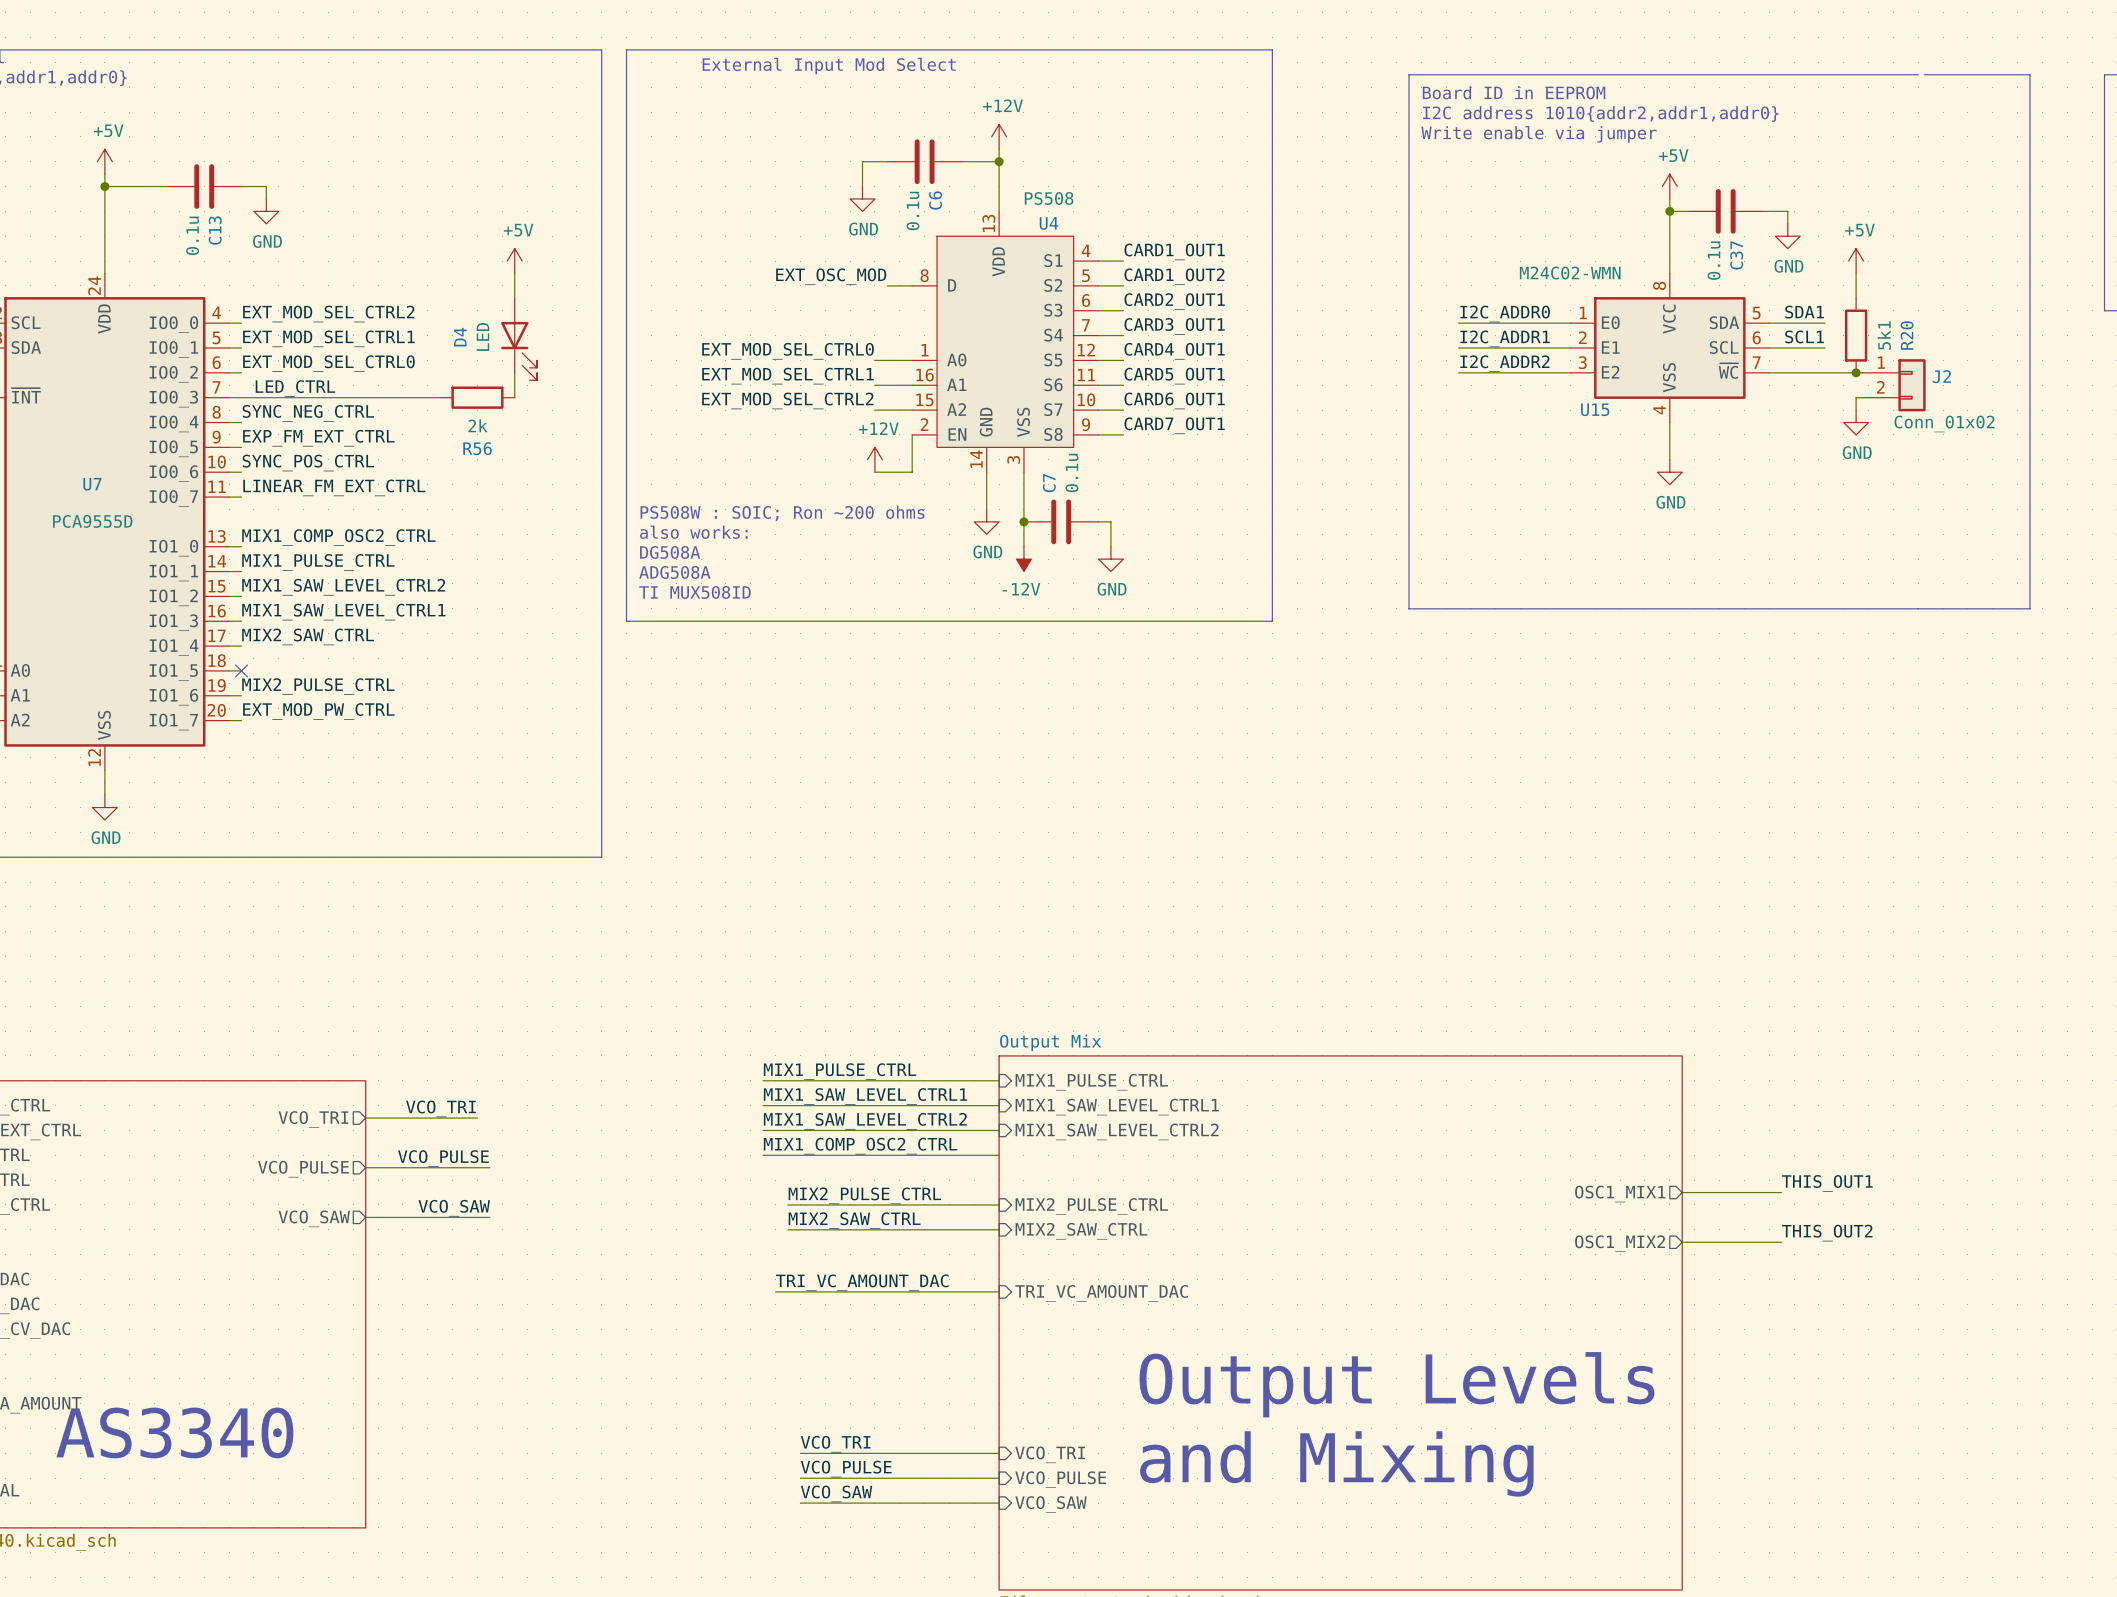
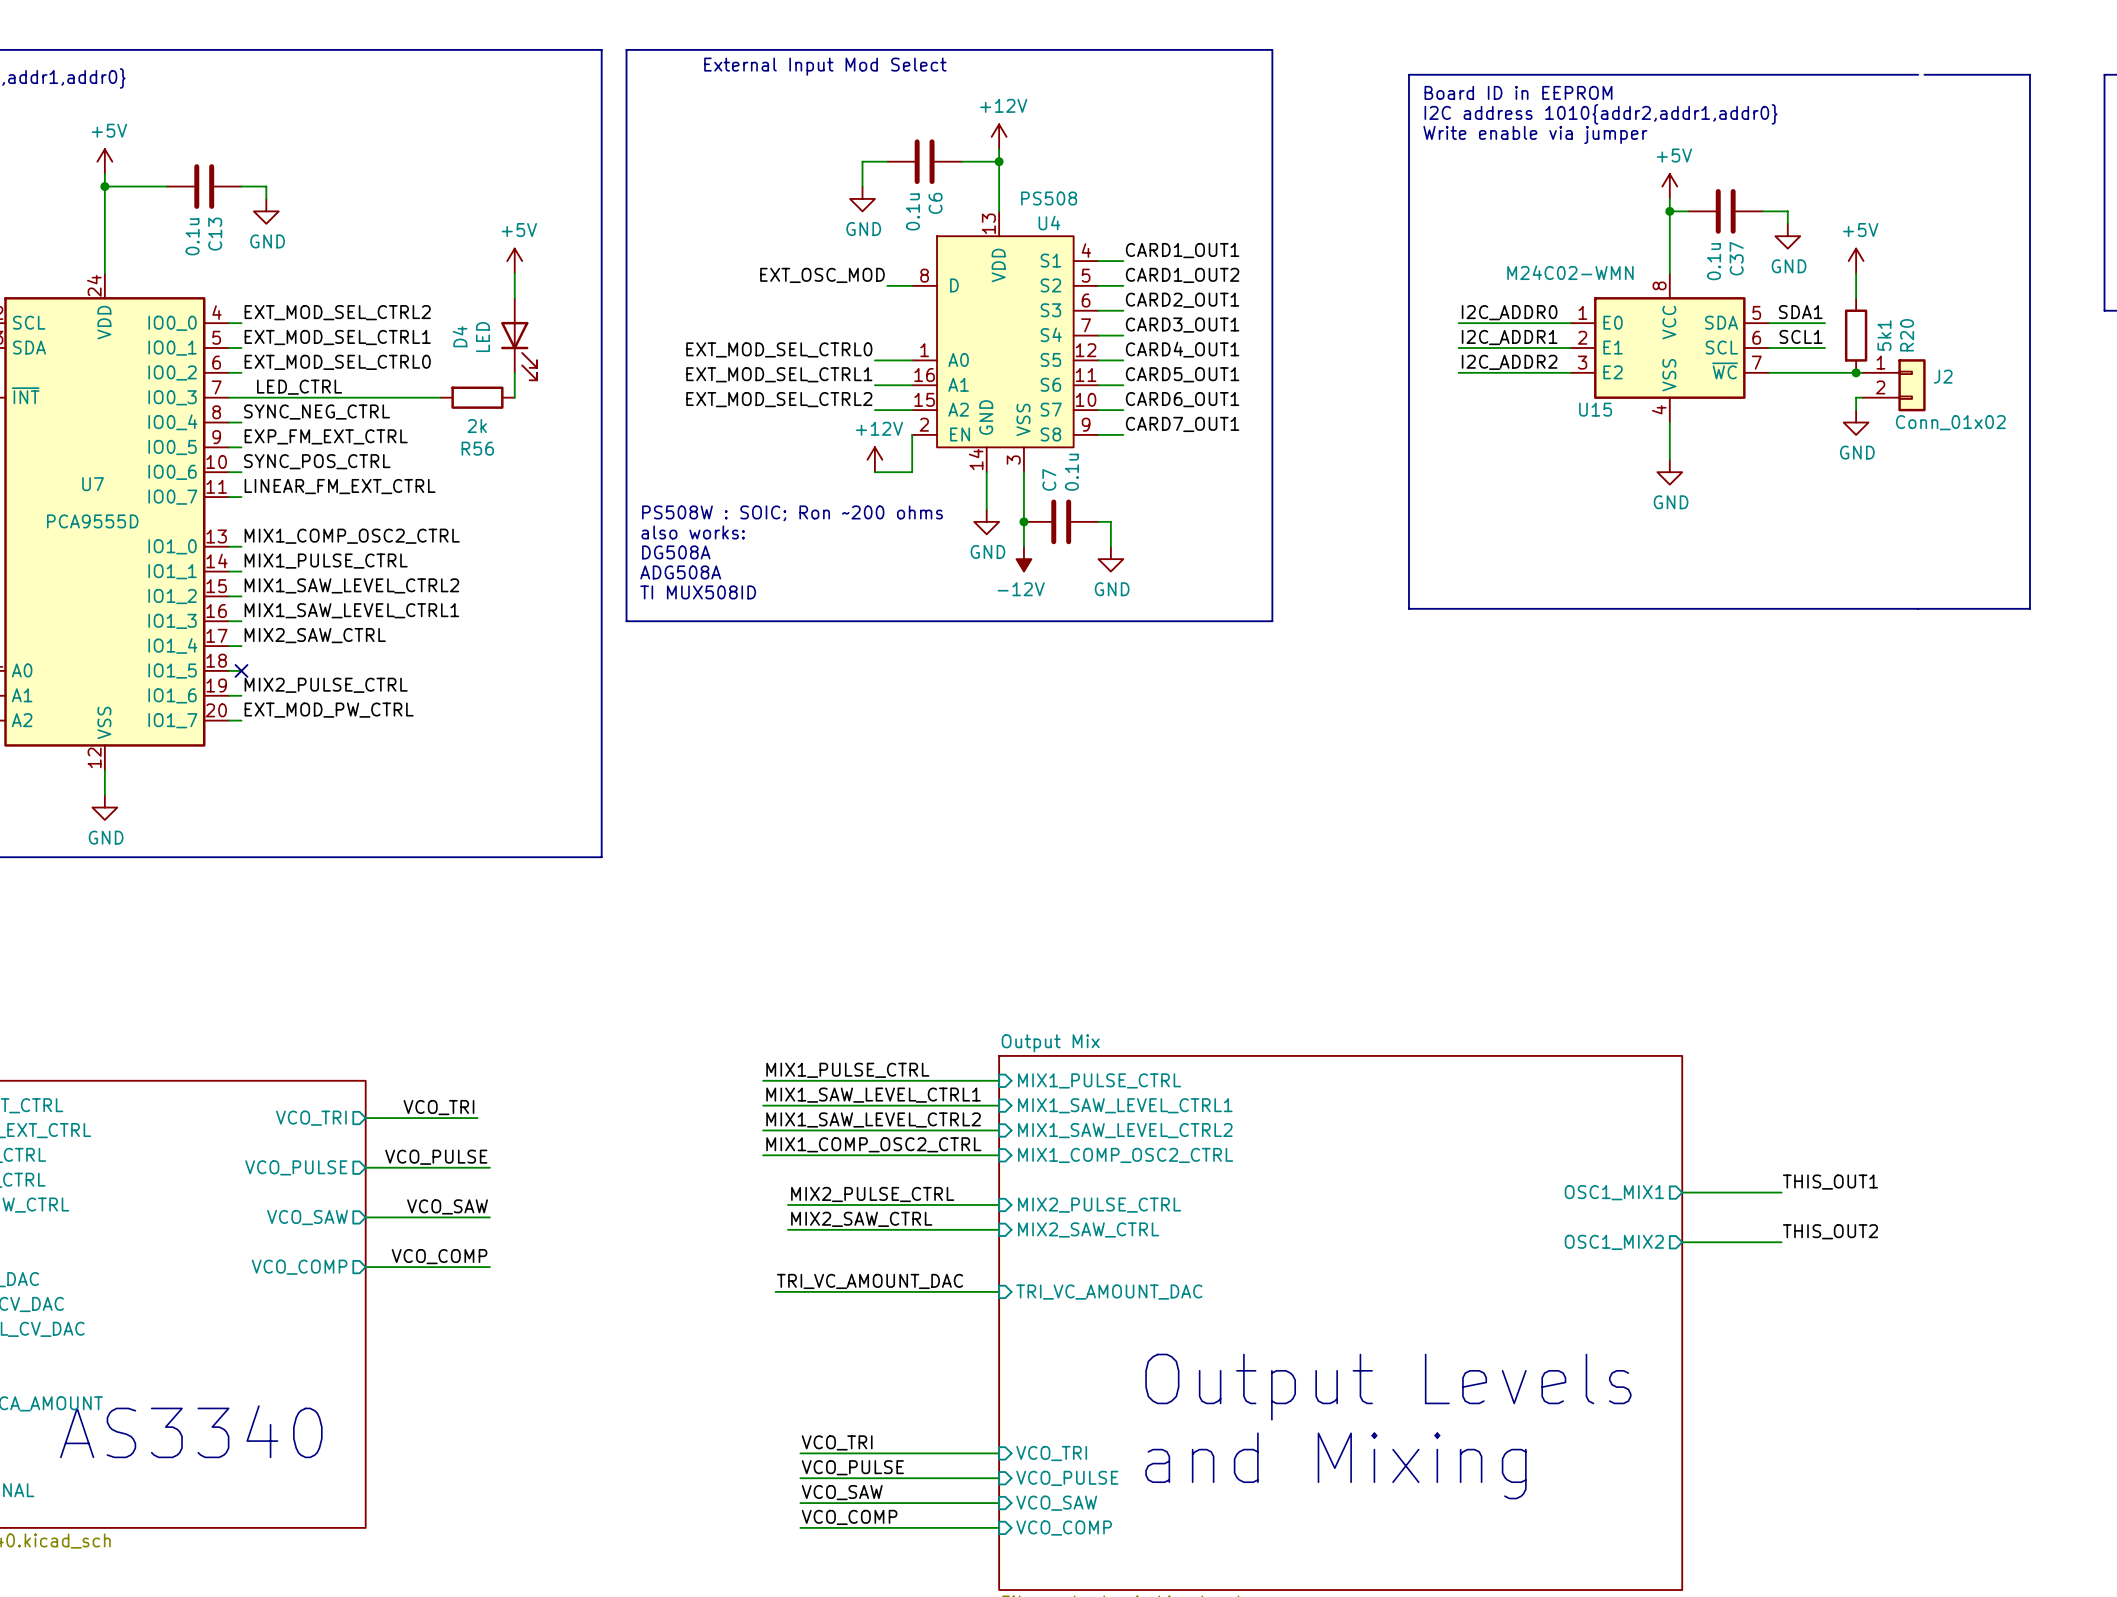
sheet pin: none -> MIX1_COMP_OSC2_CTRL (1125, 1155)
label: none -> VCO_COMP (439, 1256)
wire: none -> (365, 1267) (489, 1267)
sheet pin: none -> VCO_COMP (299, 1267)
label: none -> VCO_COMP (849, 1517)
wire: none -> (800, 1527) (999, 1527)
sheet pin: none -> VCO_COMP (1064, 1528)

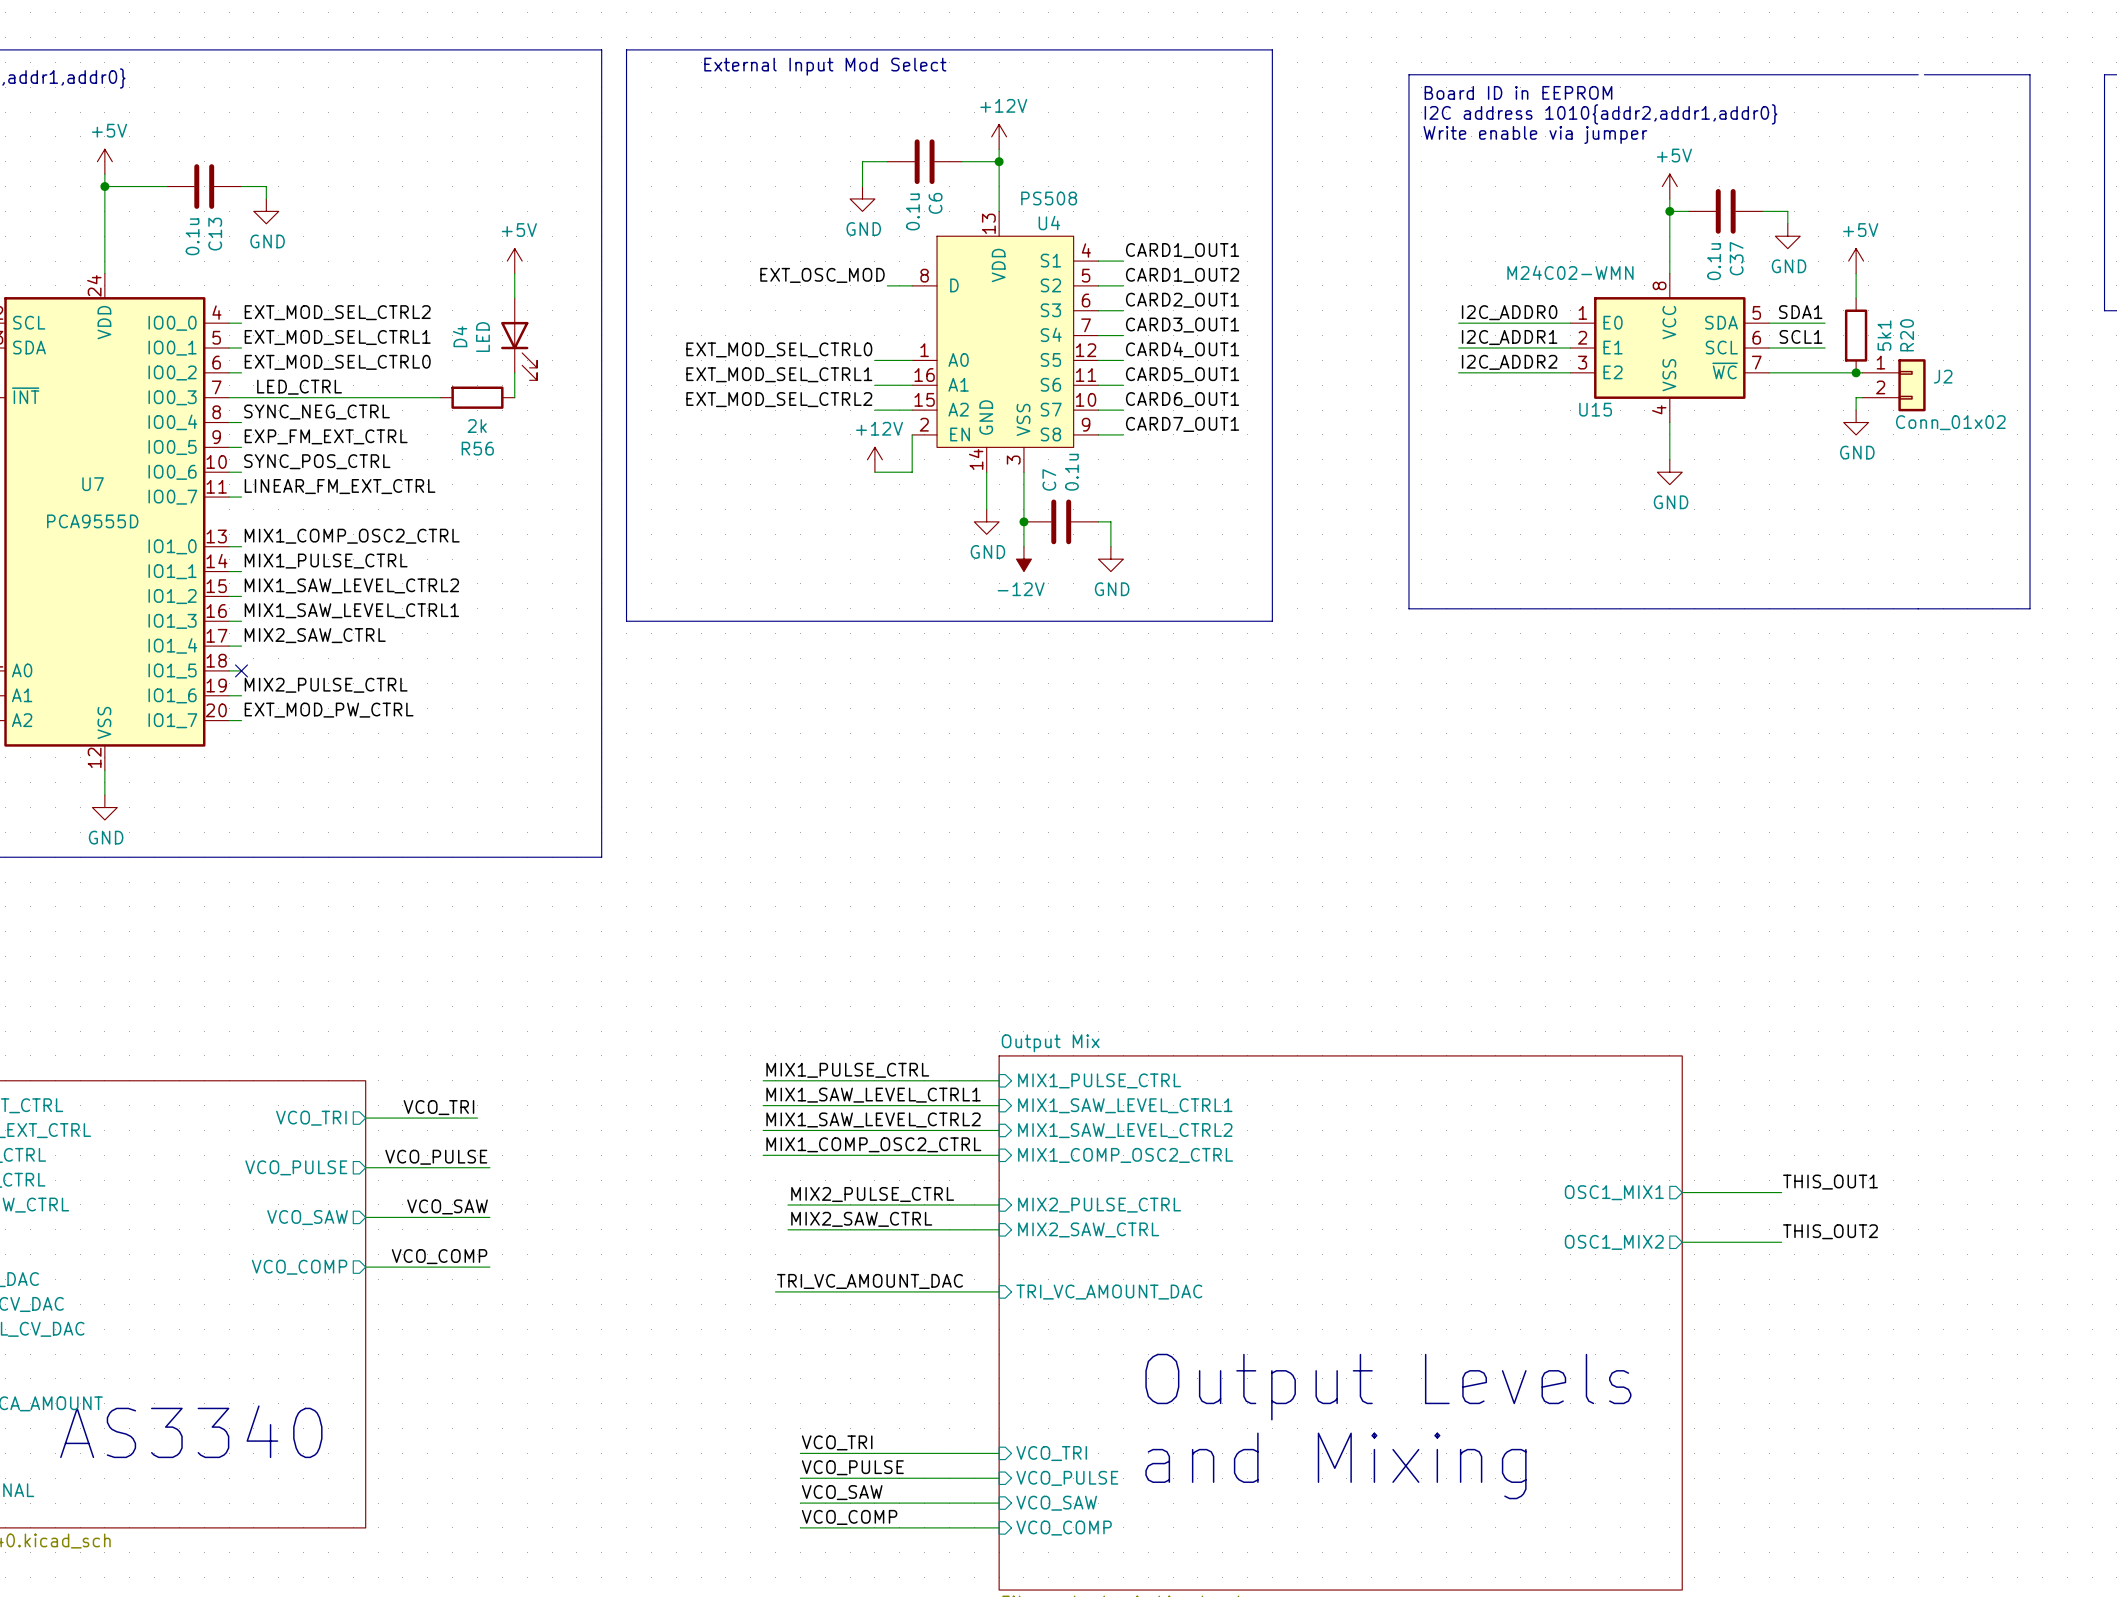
text: PS508W : SOIC; Ron ~200 ohms (792, 513) -> none
text: also works: (693, 532) -> none
text: DG508A (676, 552) -> none
text: ADG508A (680, 572) -> none
text: TI MUX508ID (698, 592) -> none

